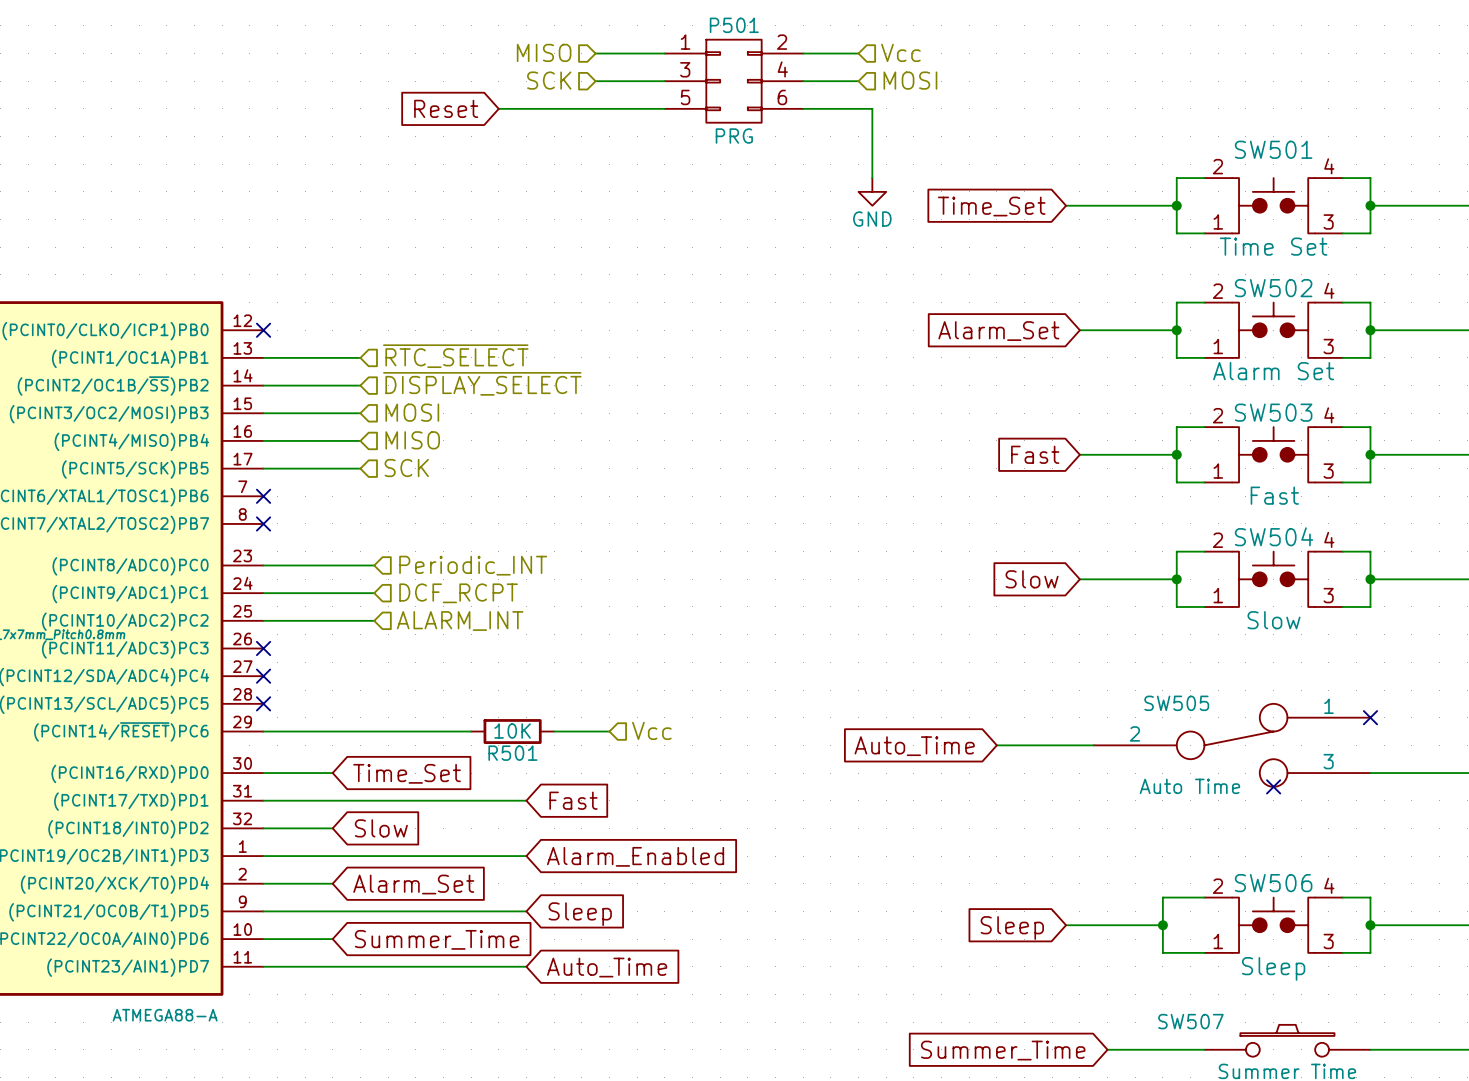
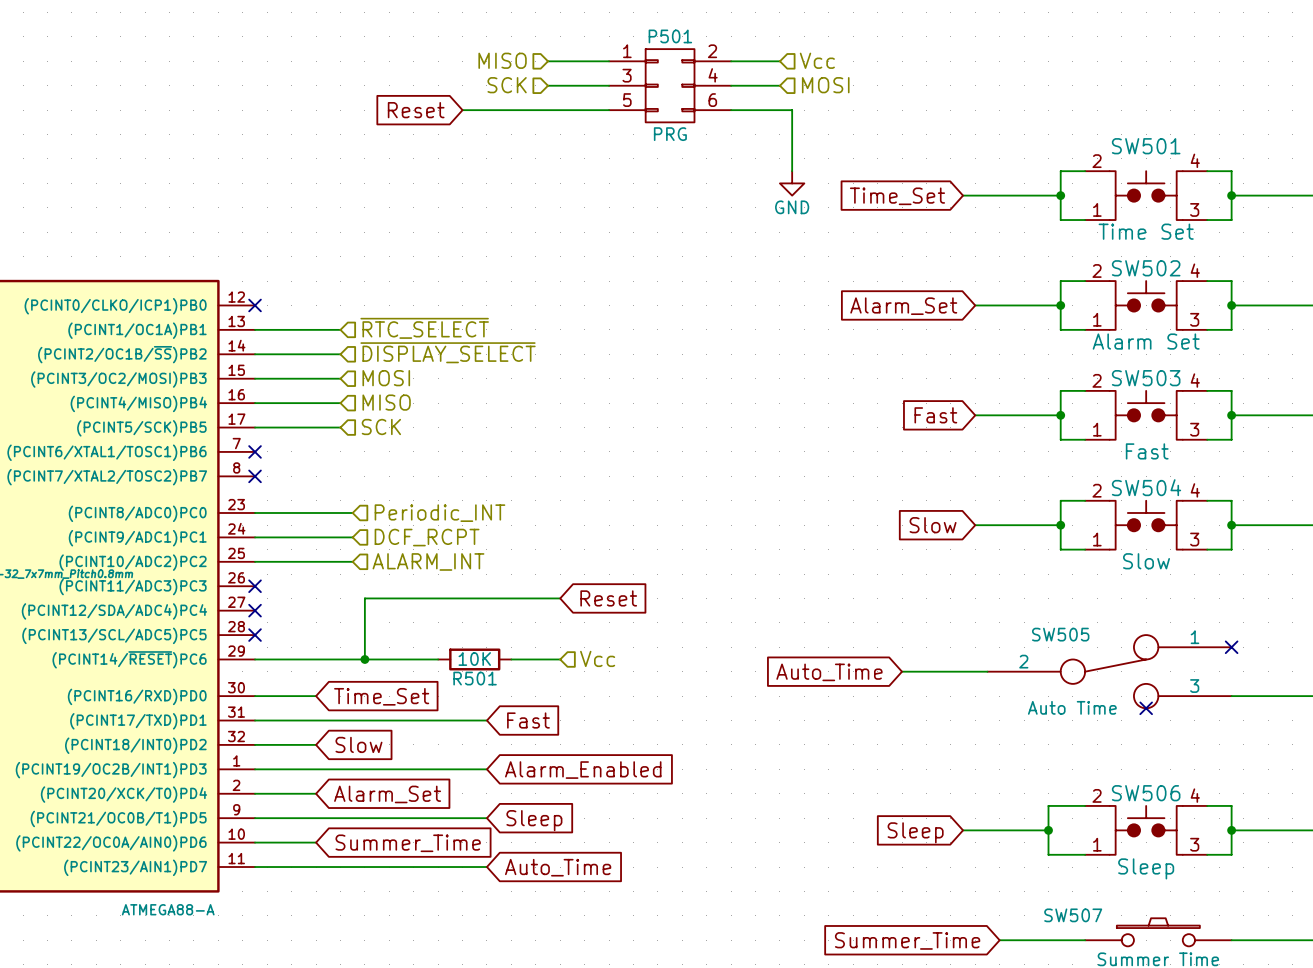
wire: none -> (560, 598) (364, 598) (364, 659)
global label: none -> Reset (608, 598)
junction: none -> (364, 659)

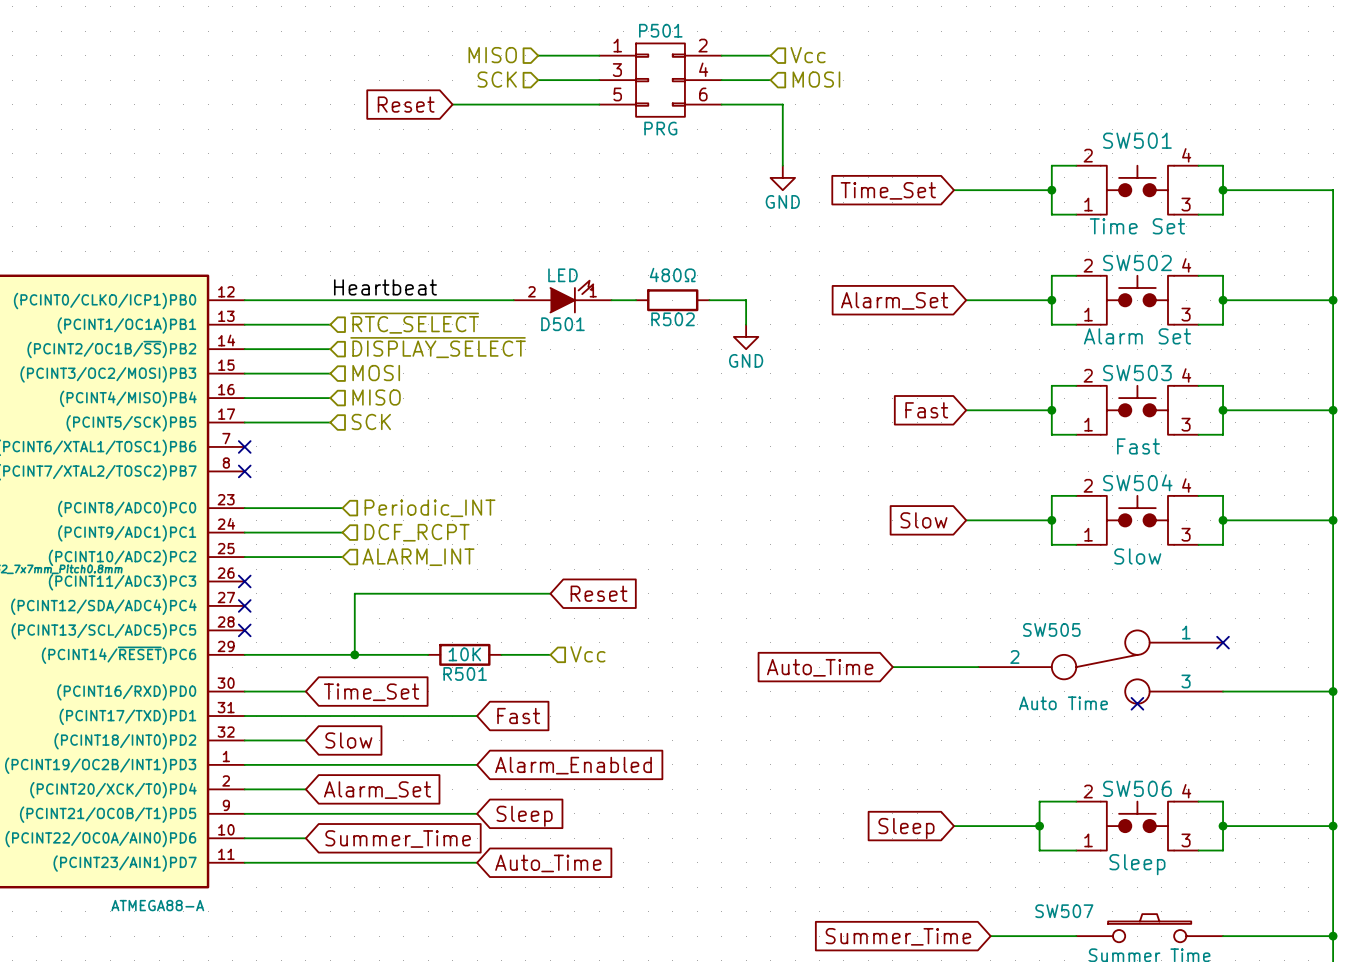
label: none -> Heartbeat (385, 287)
D501: none -> LED (562, 296)
wire: none -> (244, 300) (513, 300)
no-connect mark: (255, 305) -> none
wire: none -> (611, 300) (636, 300)
R502: none -> 480Ω (672, 300)
wire: none -> (709, 300) (746, 300) (746, 324)
power symbol: none -> GND (746, 336)

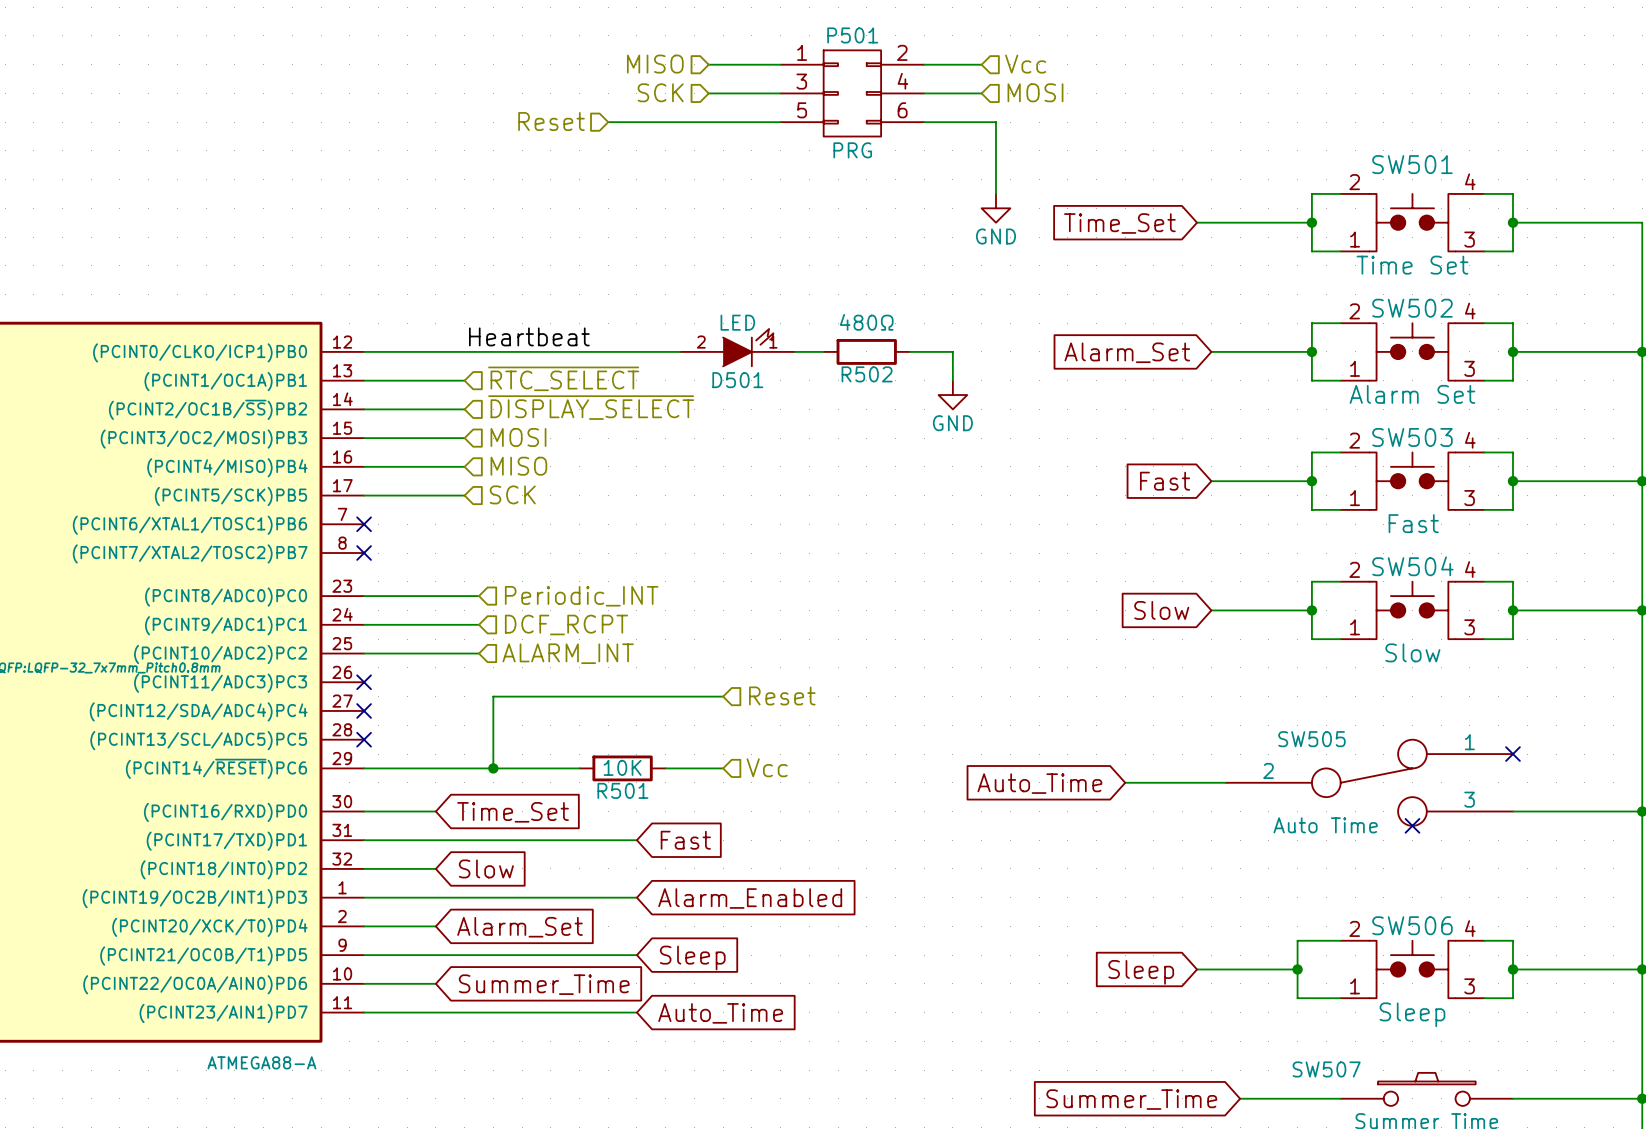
hierarchical label: none -> Reset (551, 121)
global label: Reset (406, 104) -> none
global label: Reset (599, 593) -> none
hierarchical label: none -> Reset (782, 695)

